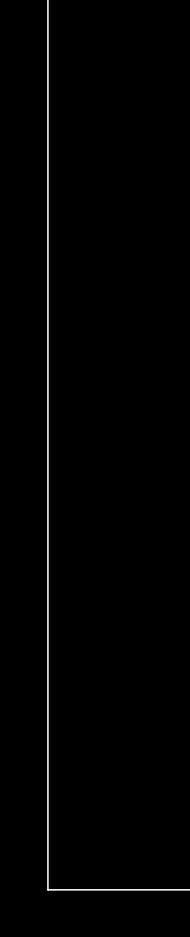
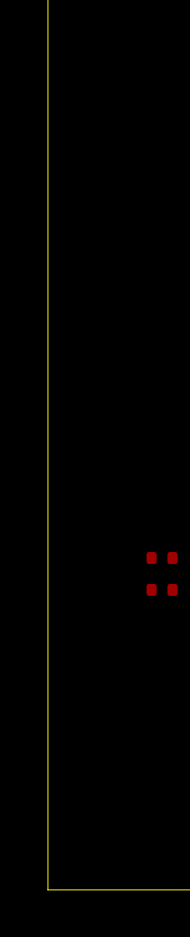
part: none -> (162, 558)
part: none -> (162, 589)

